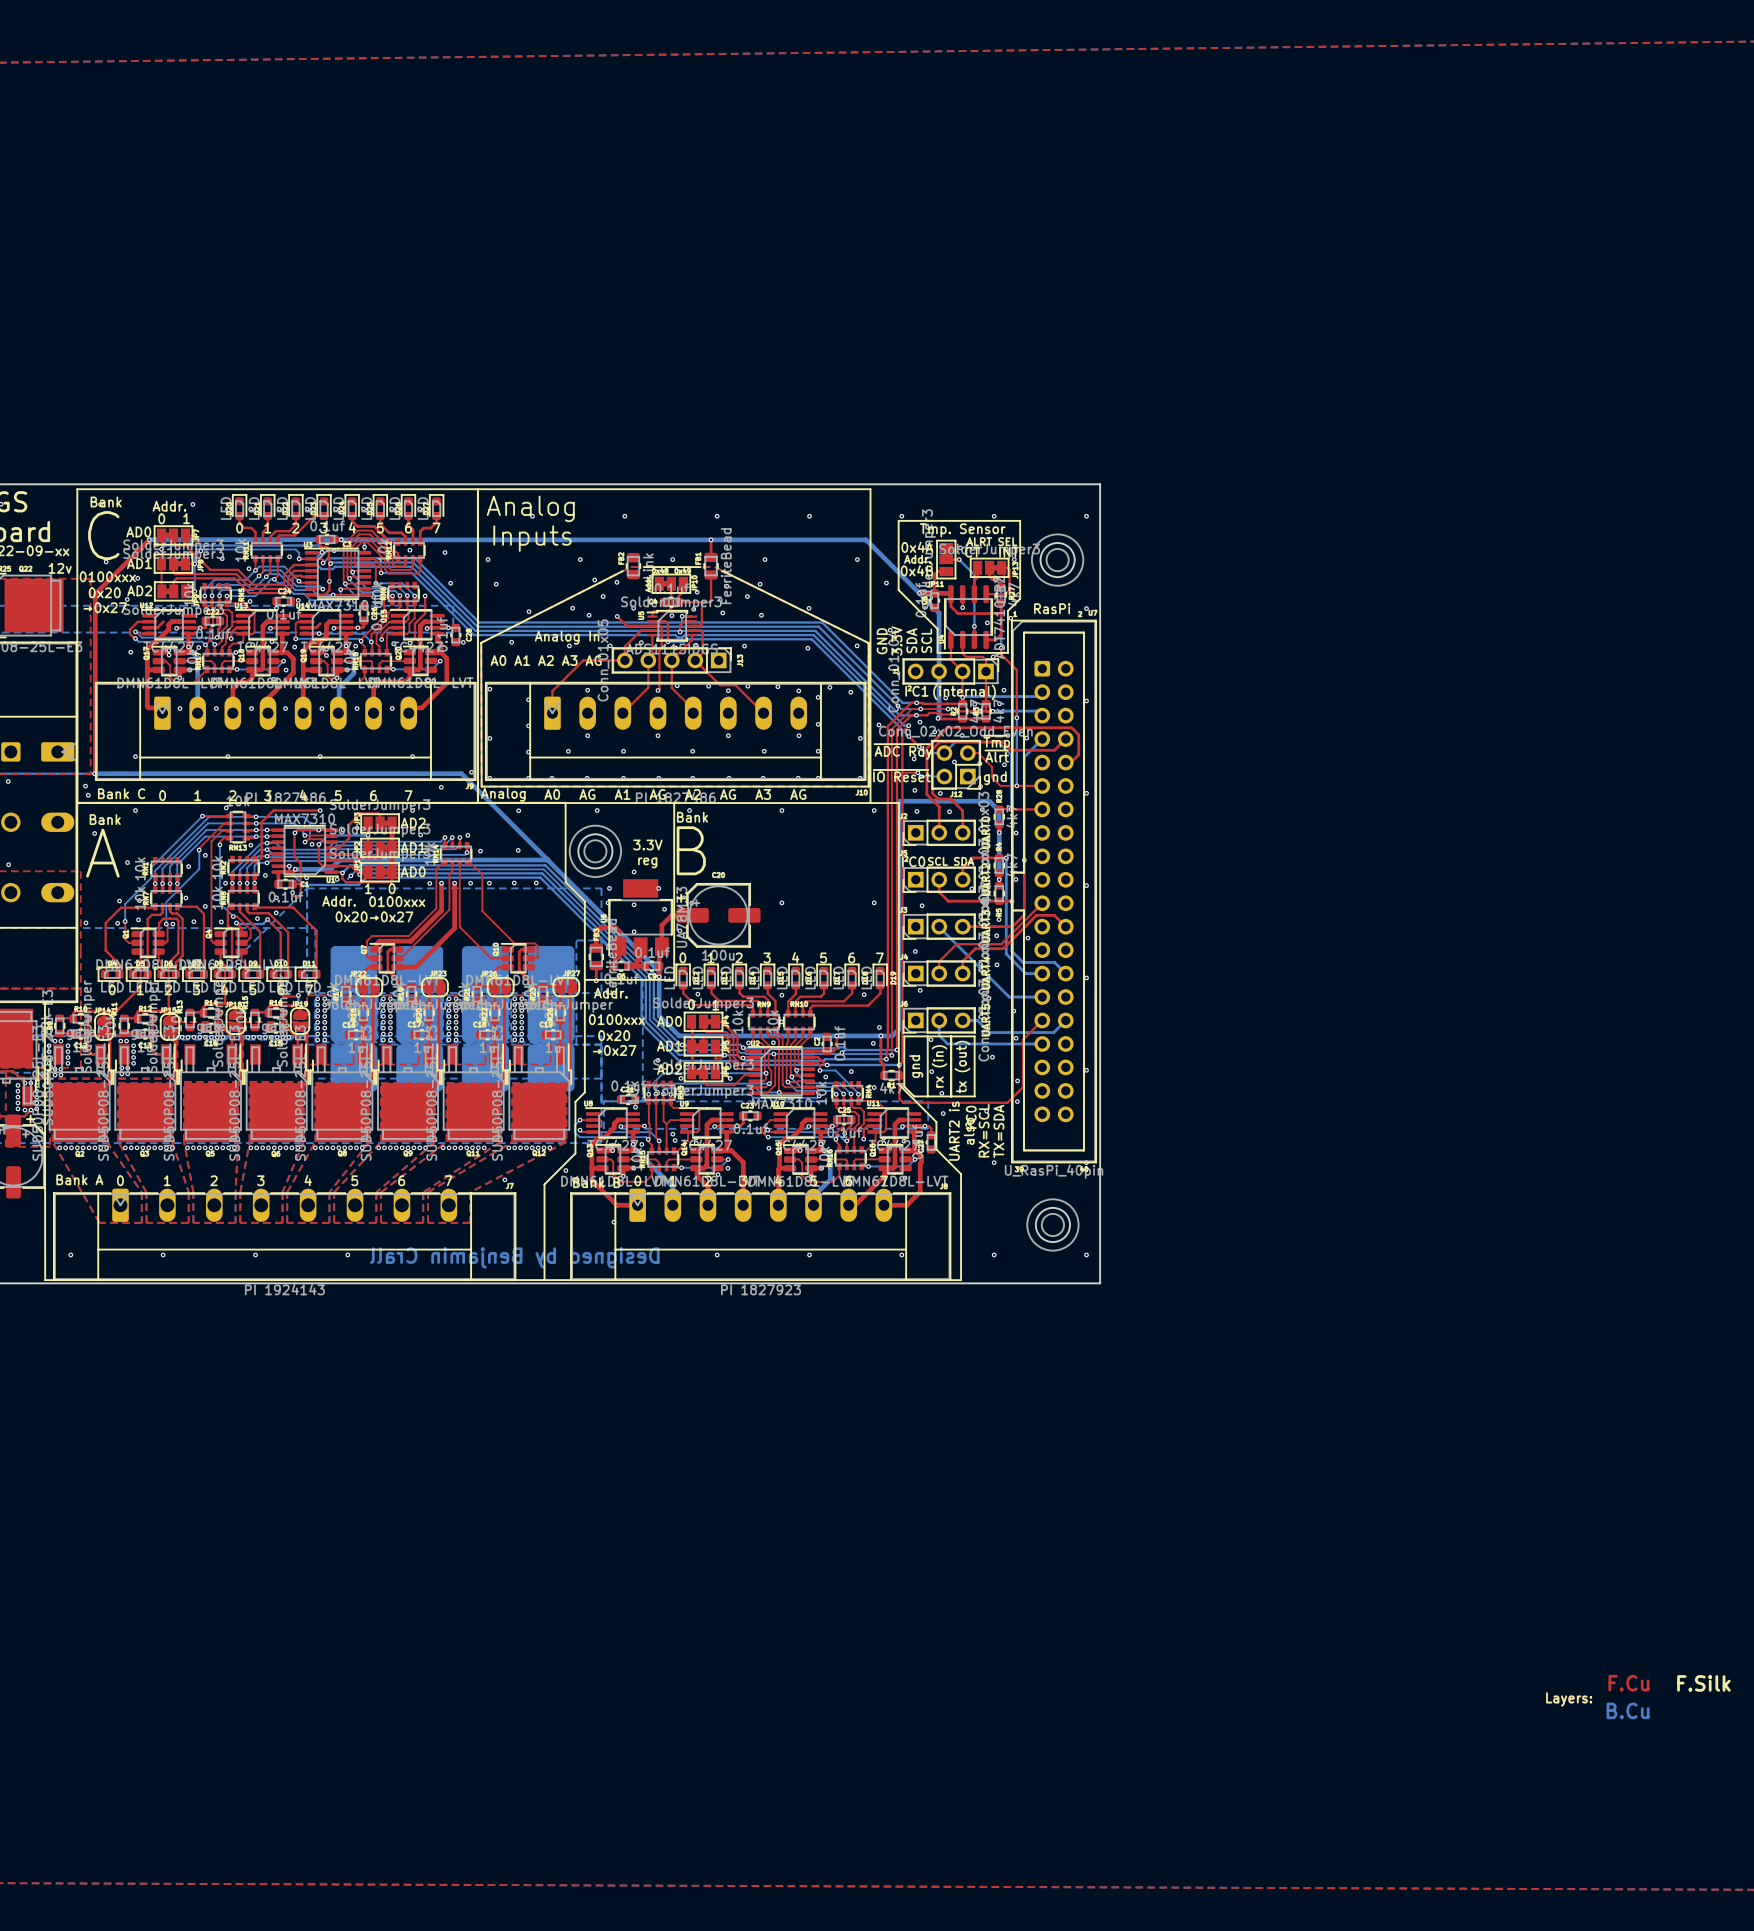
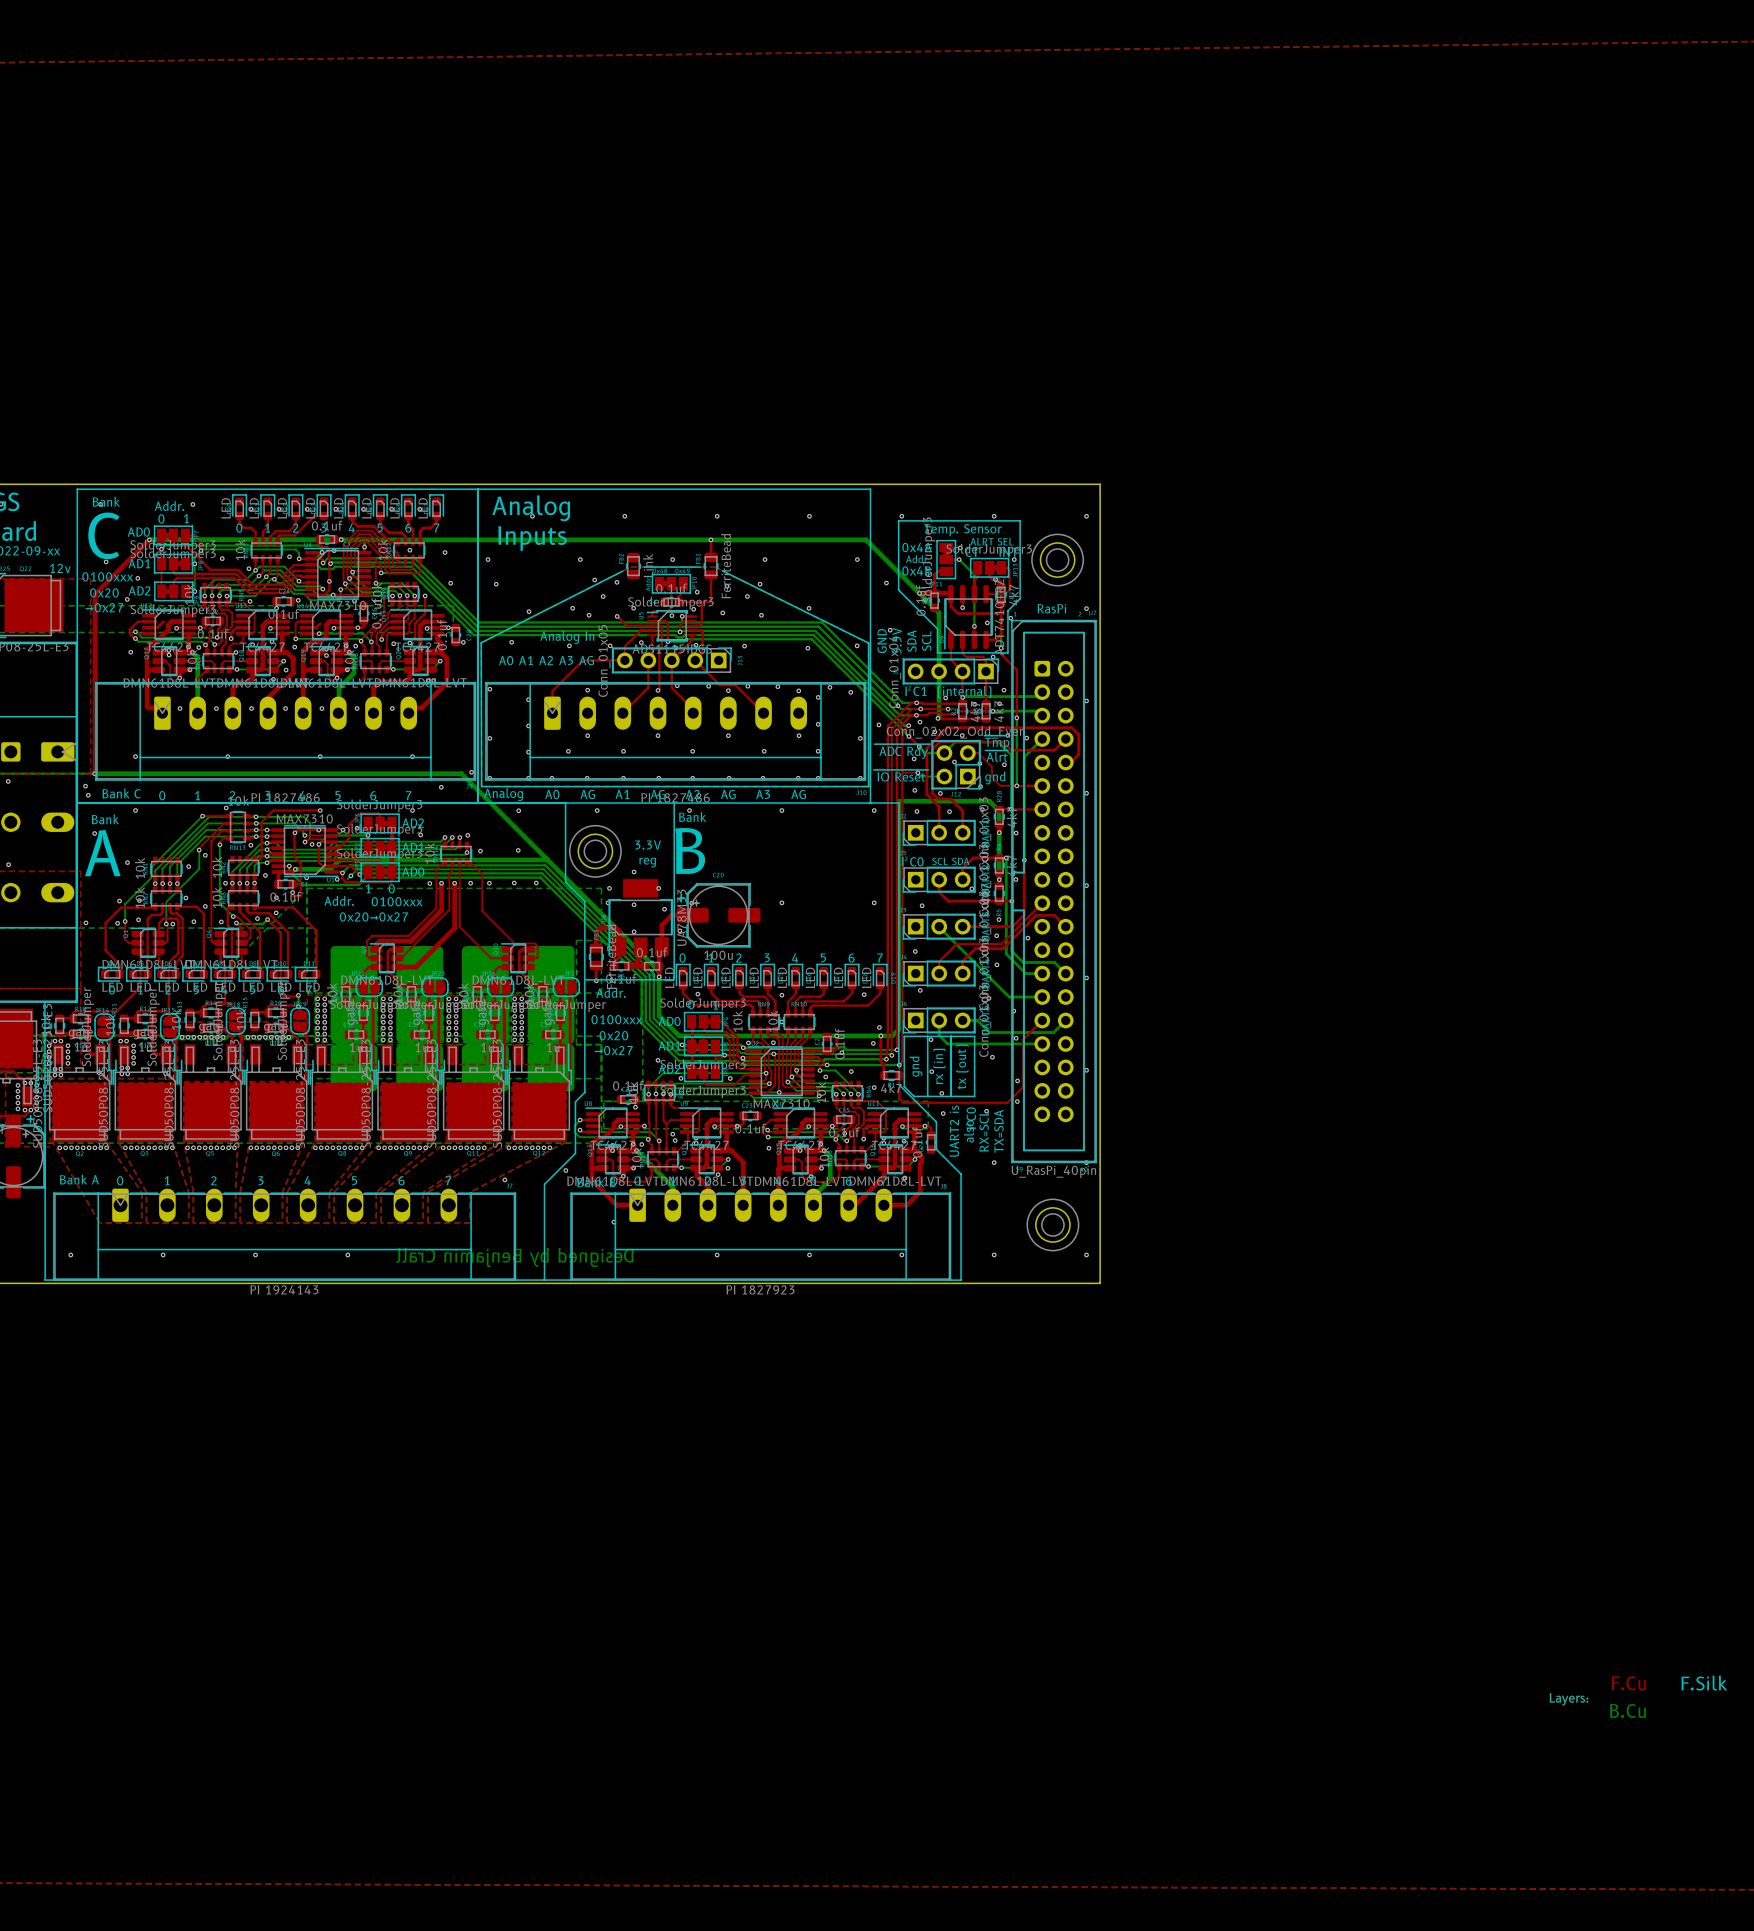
text: Tmp. Sensor (962, 530) -> Temp. Sensor (962, 530)

